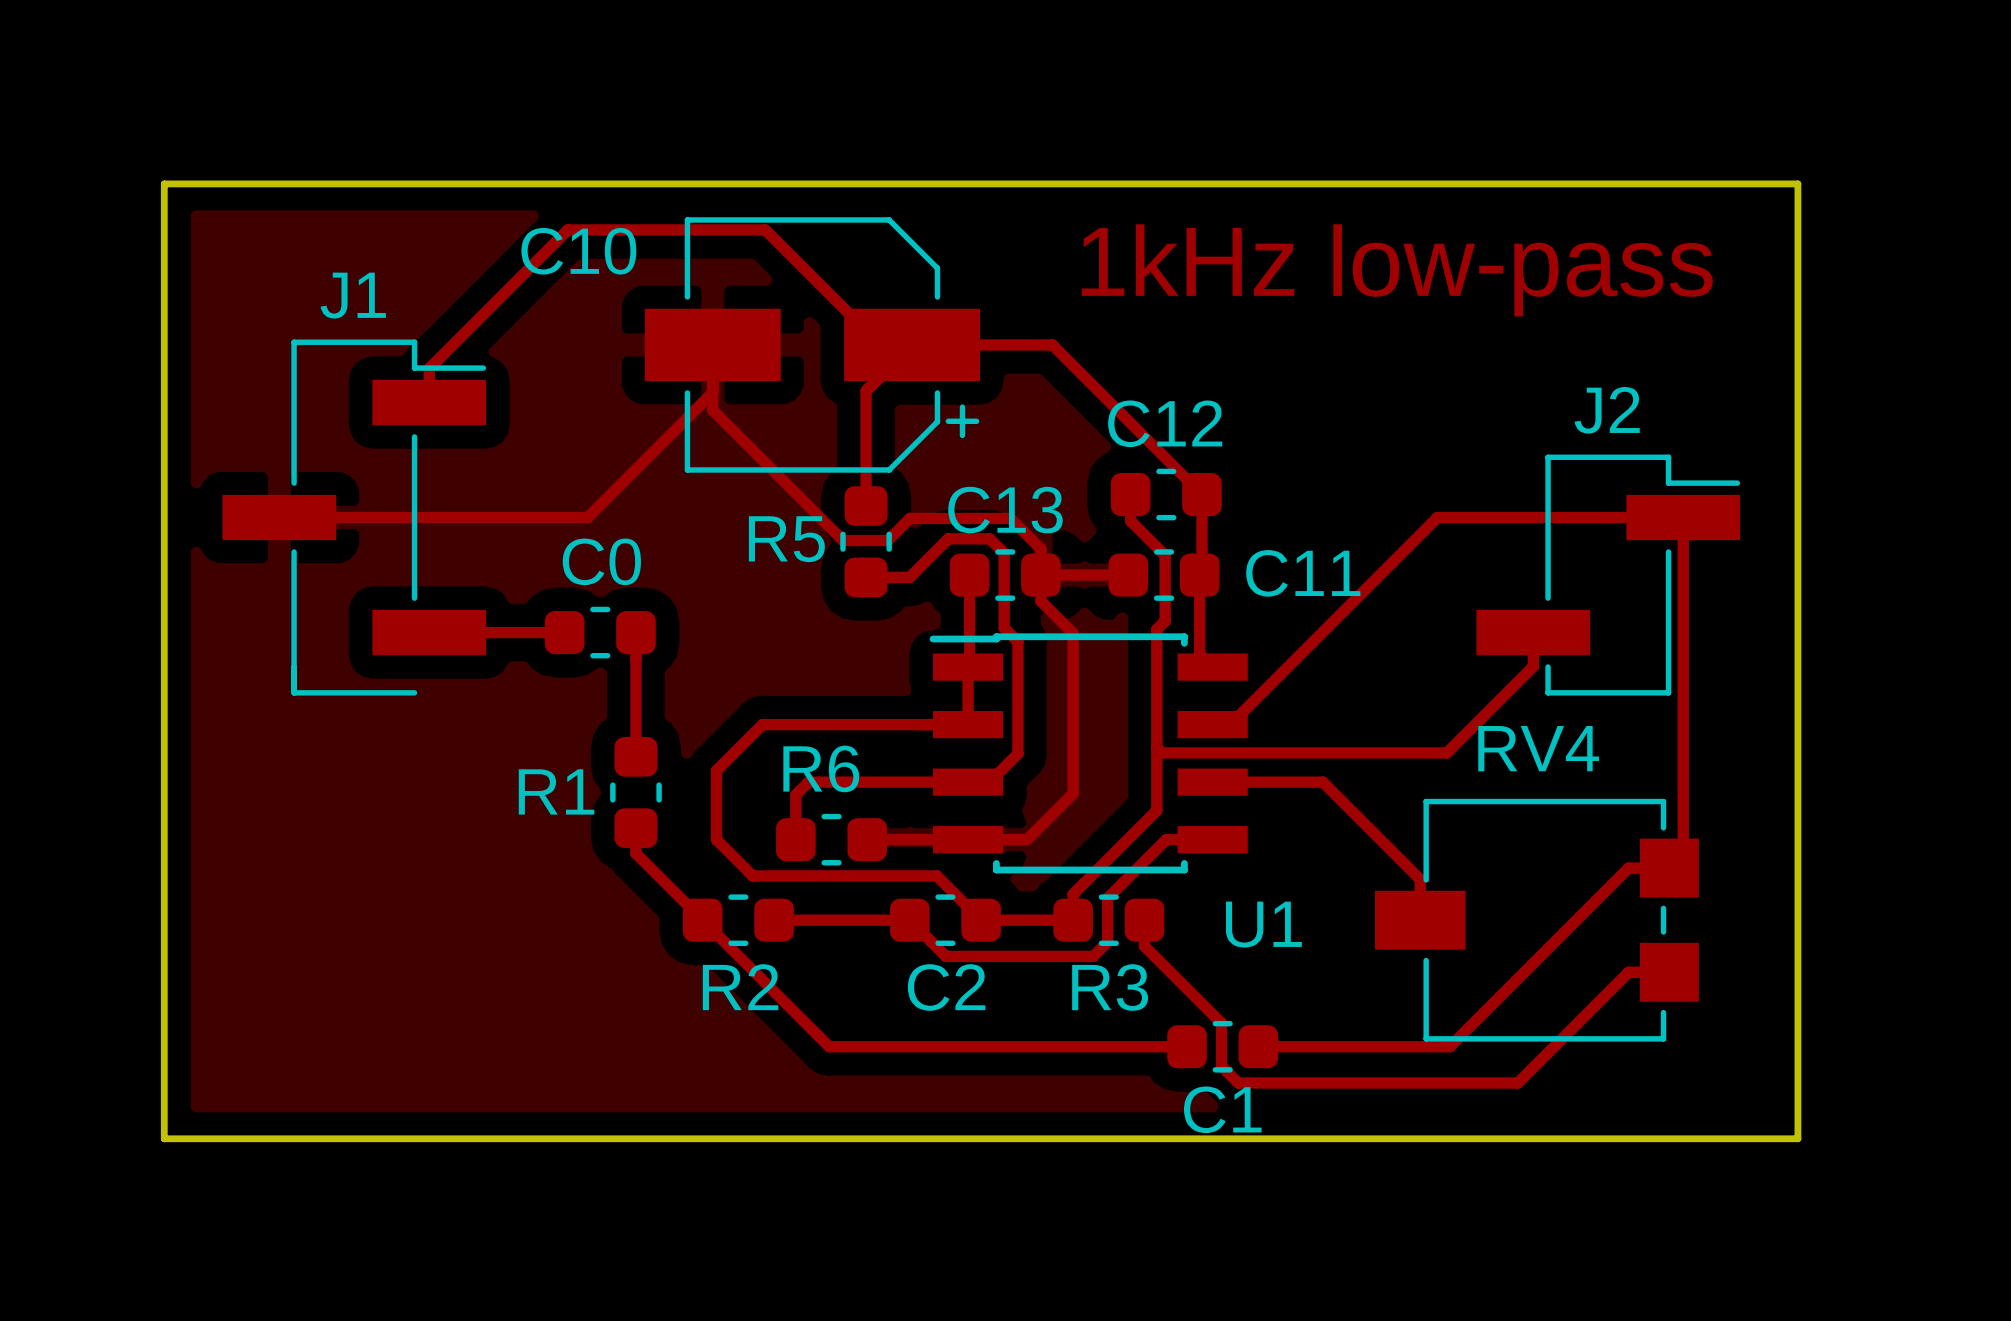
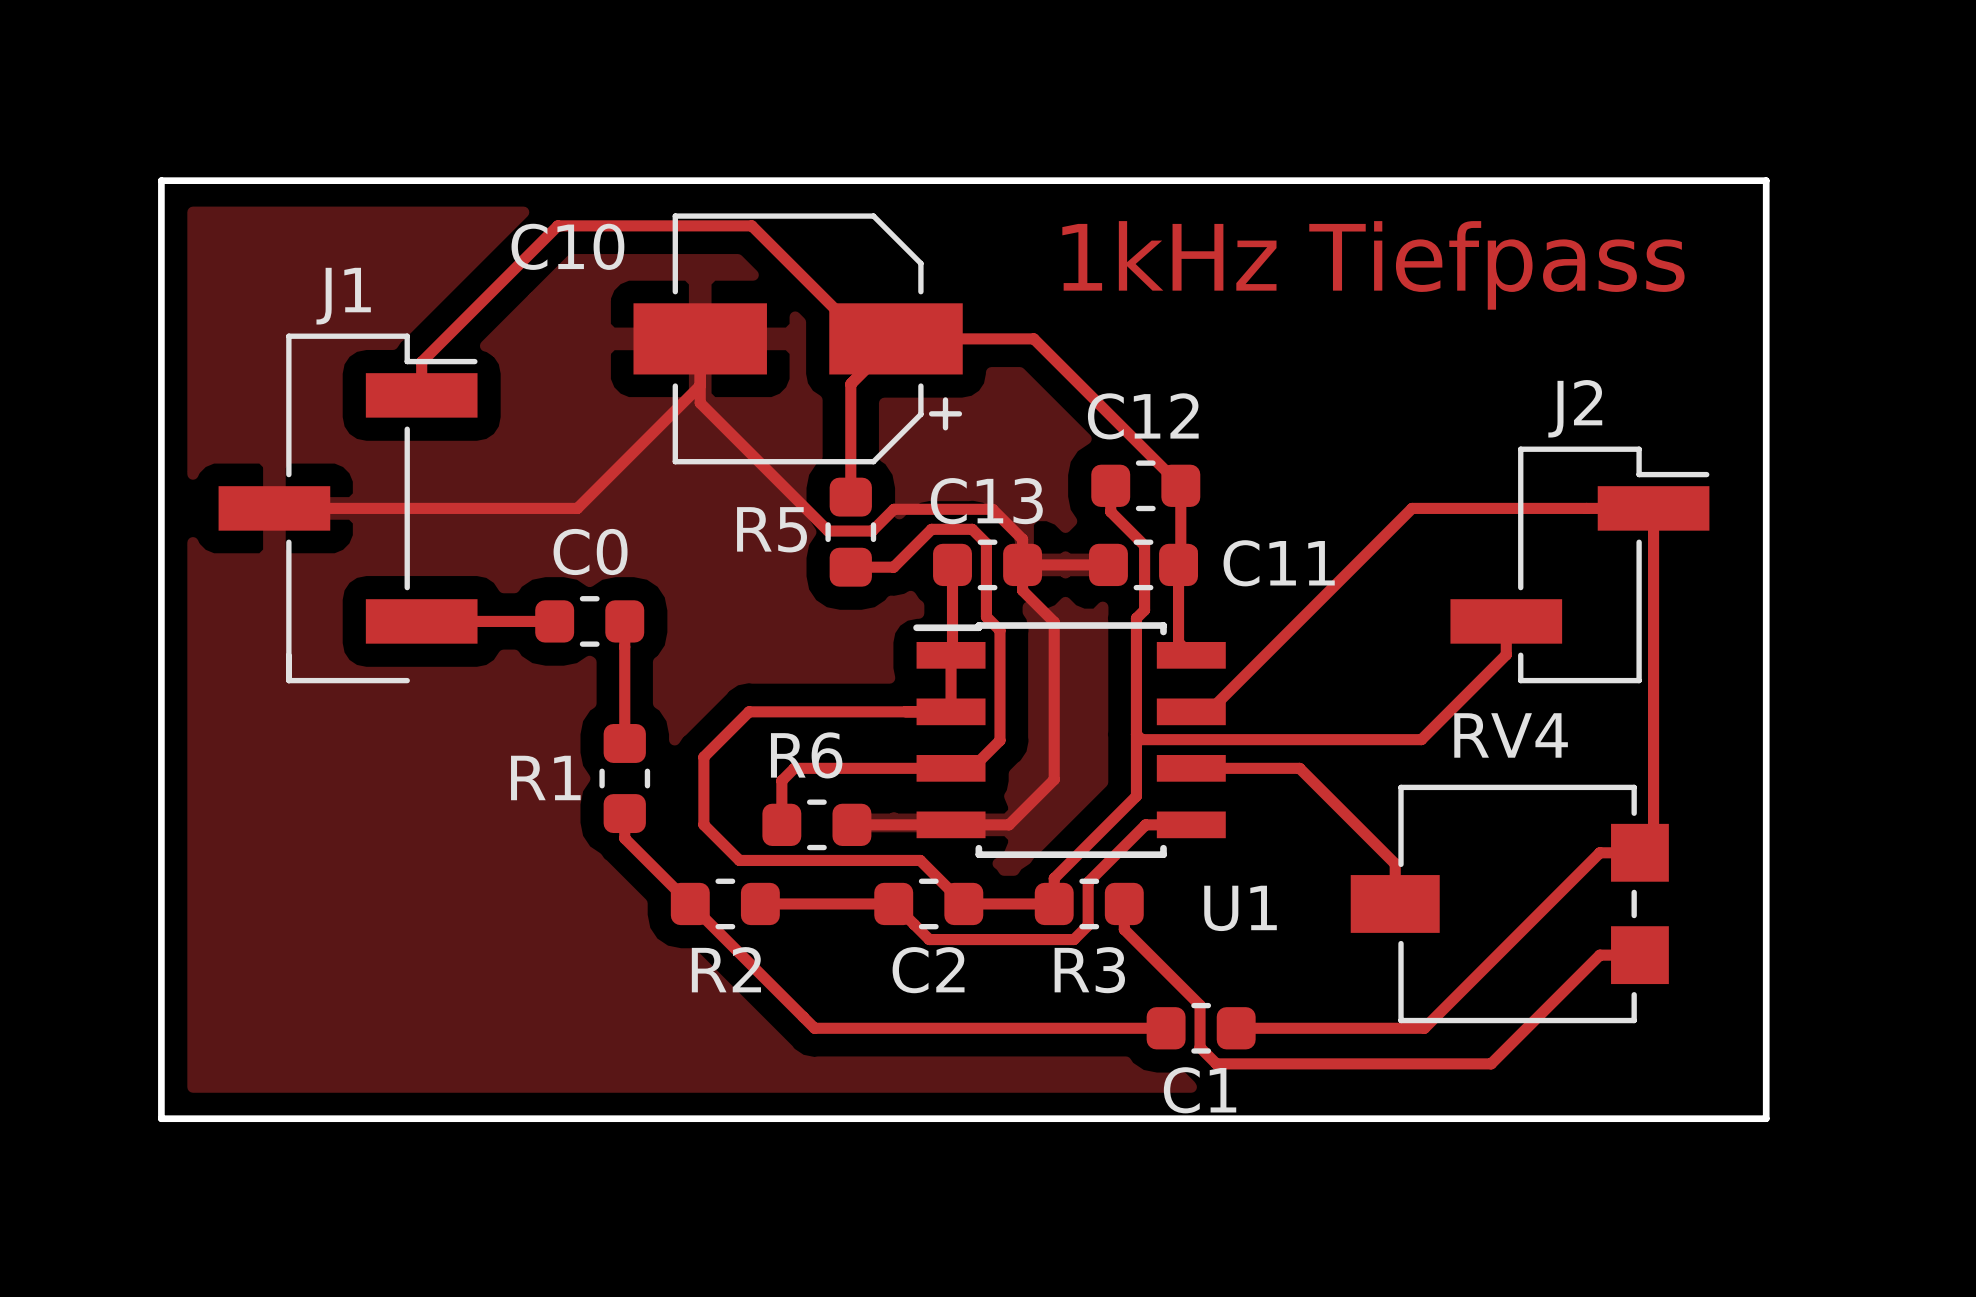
text: 1kHz low-pass (1397, 270) -> 1kHz Tiefpass (1373, 265)

